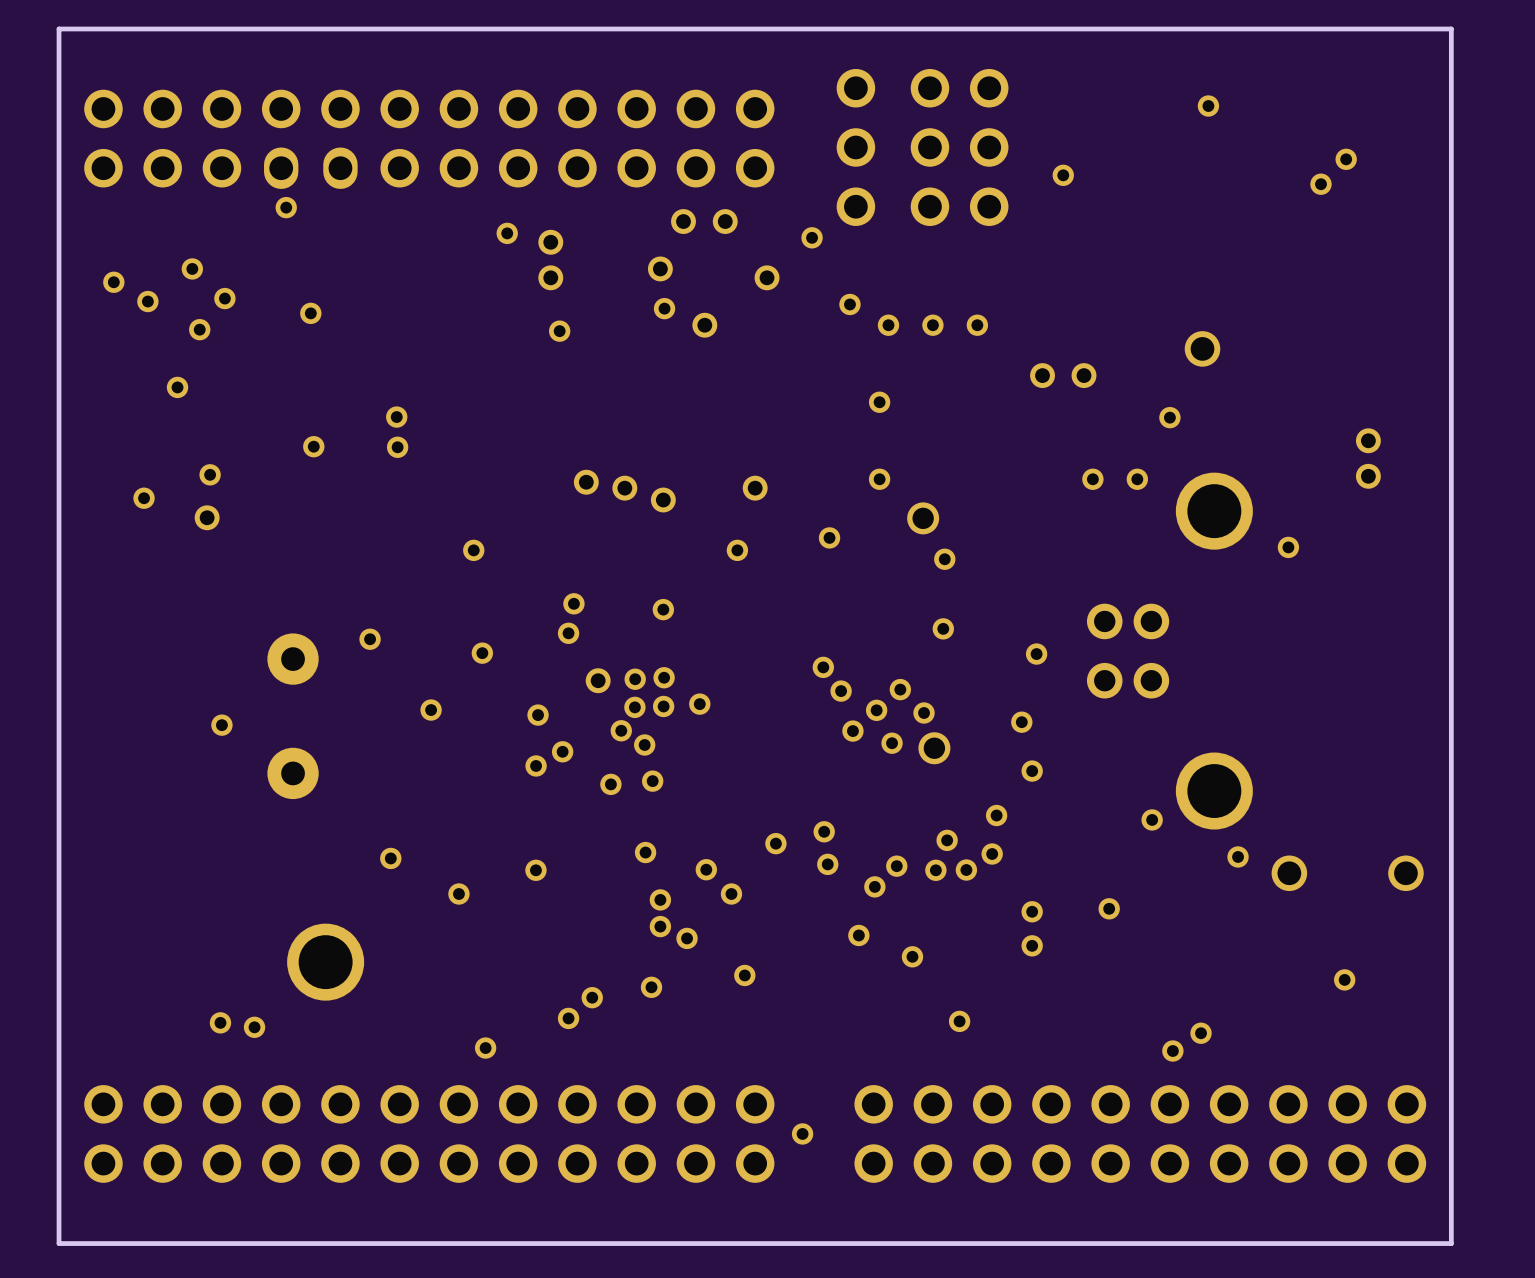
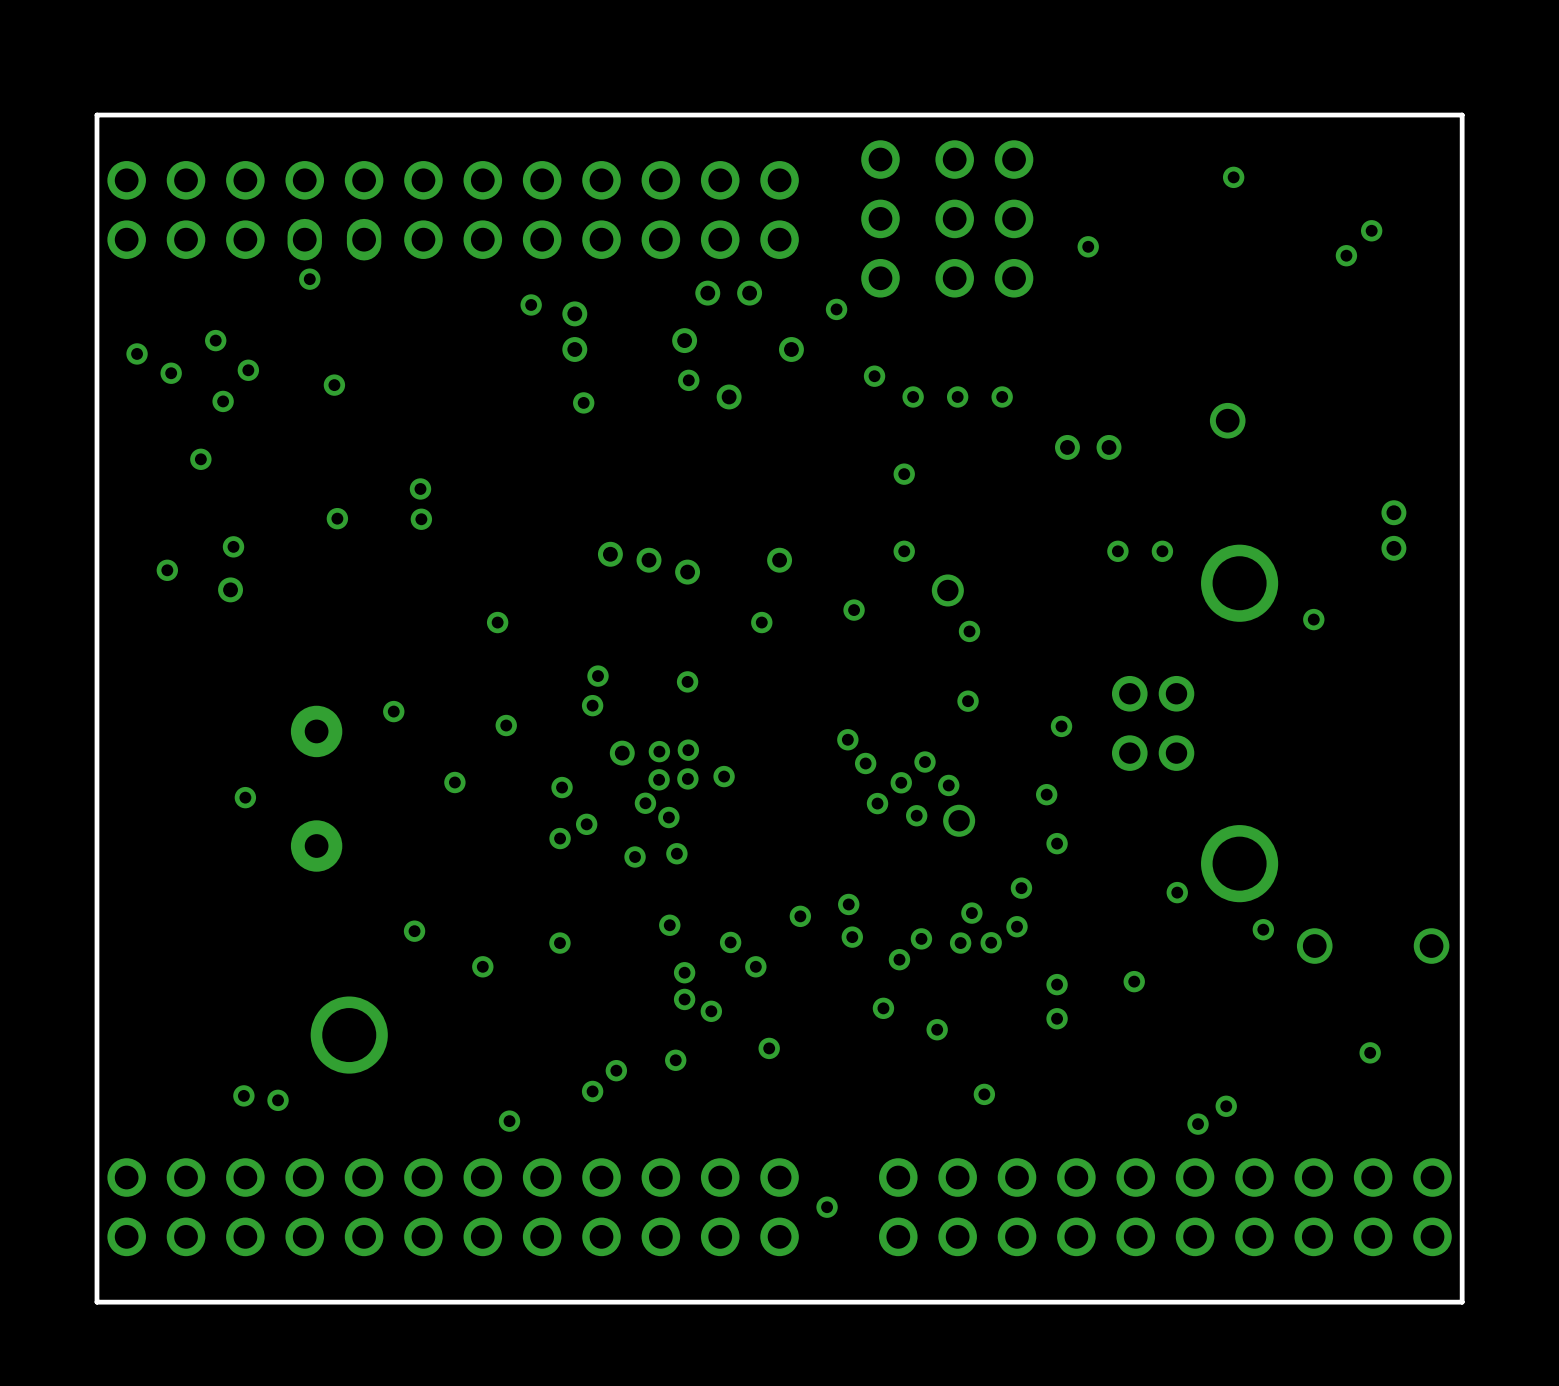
board edge: (1451, 28) (1451, 1243) (59, 1243) (59, 28) (1451, 28) -> (1462, 115) (1462, 1302) (96, 1302) (96, 115) (1462, 115)
part: (1169, 417) -> none

